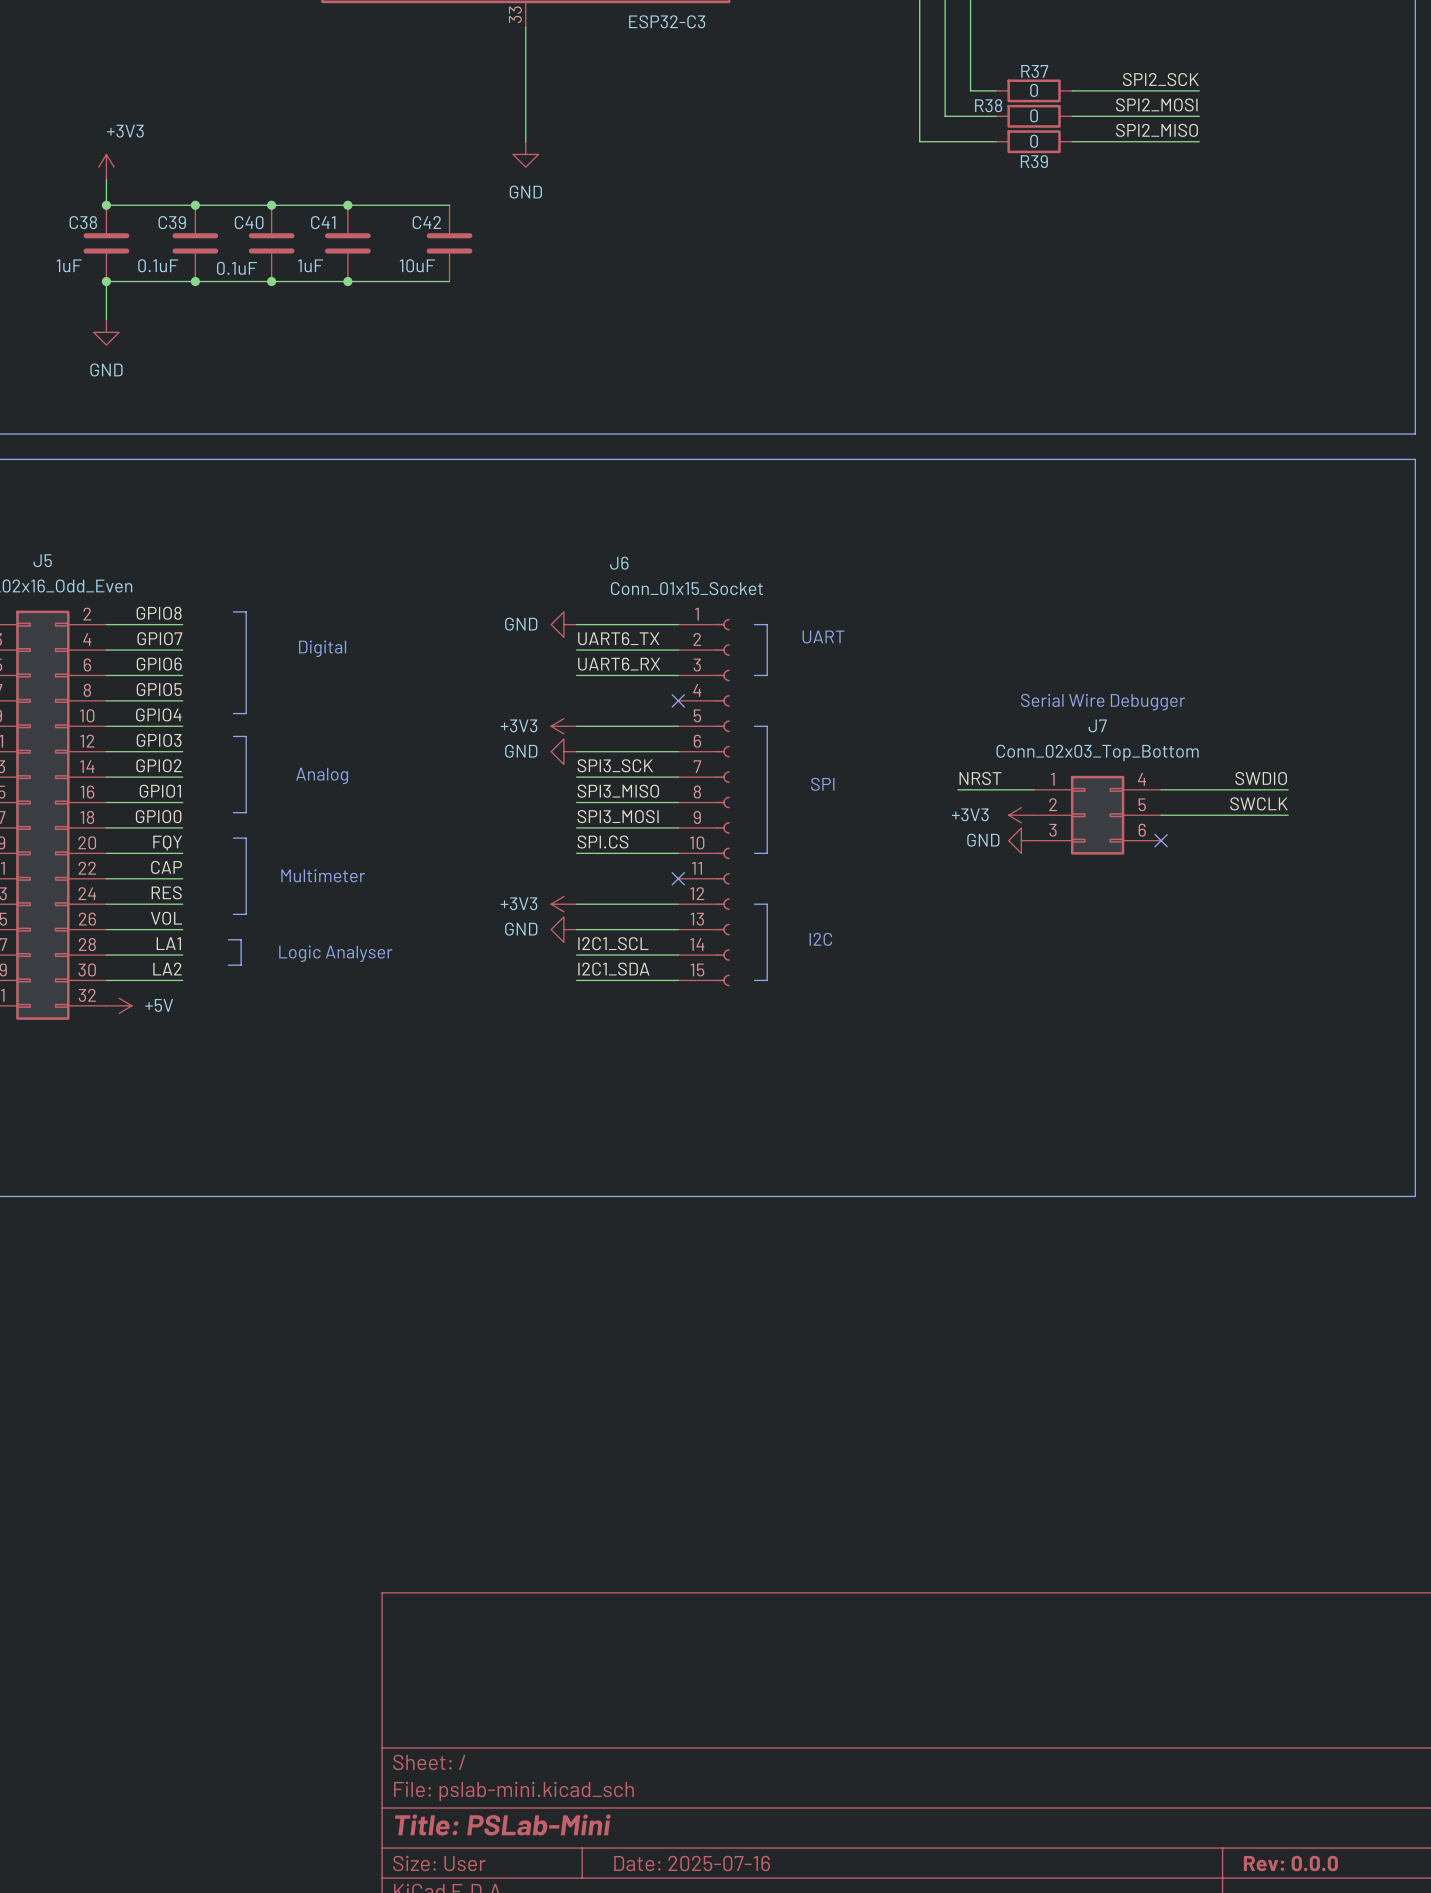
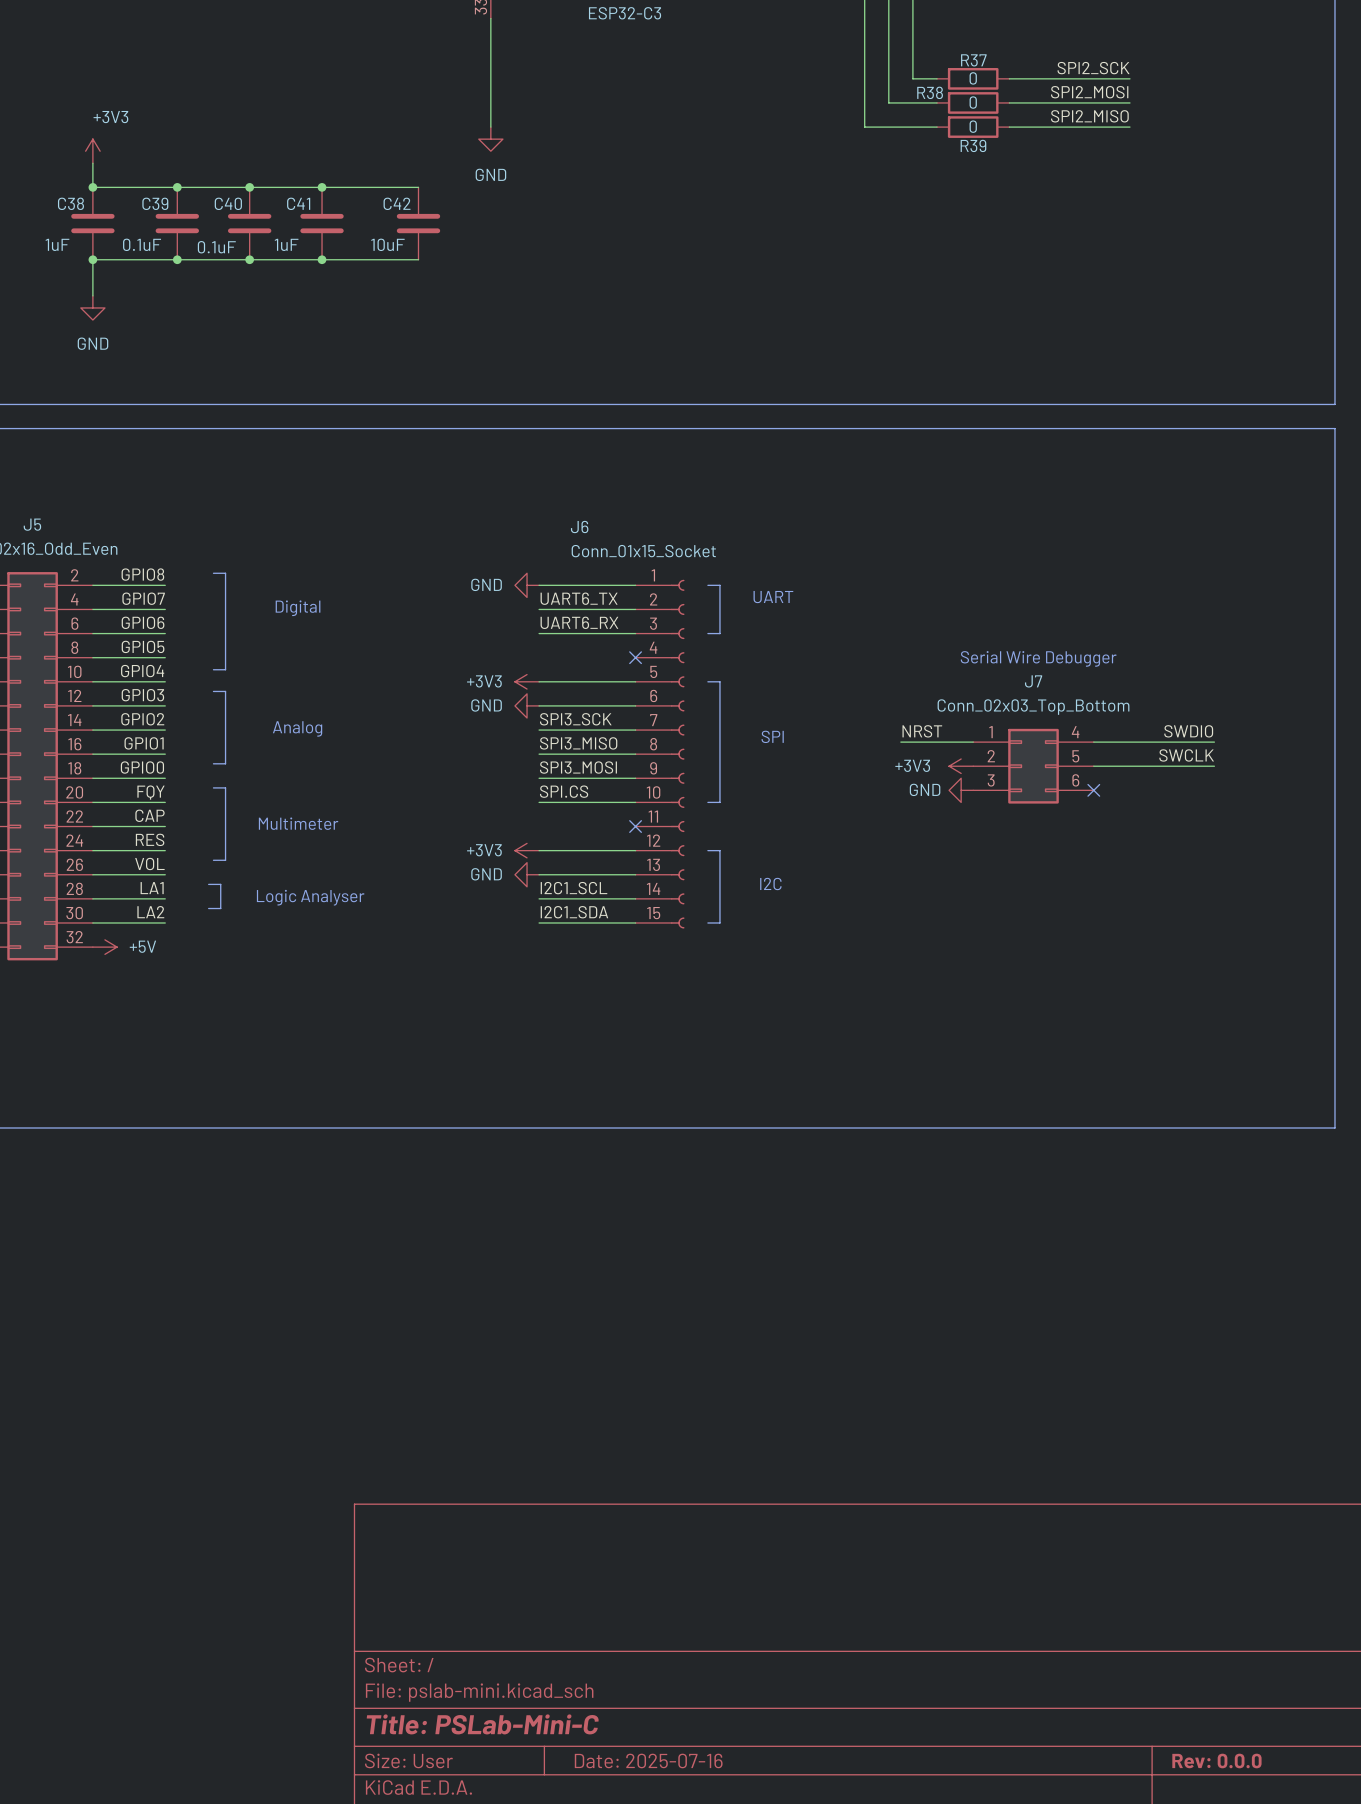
title block: Title: PSLab-Mini (502, 1824) -> Title: PSLab-Mini-C (482, 1724)

